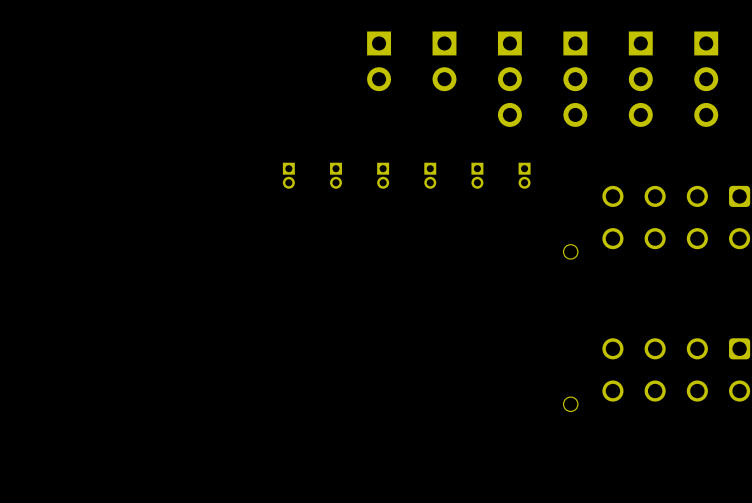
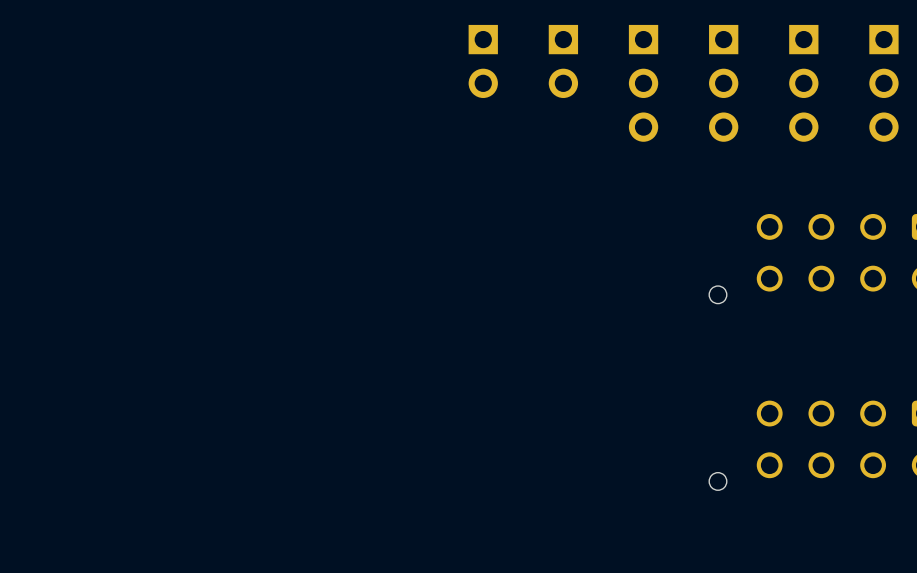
part: (288, 175) -> none
part: (335, 175) -> none
part: (383, 175) -> none
part: (430, 175) -> none
part: (477, 175) -> none
part: (524, 175) -> none

